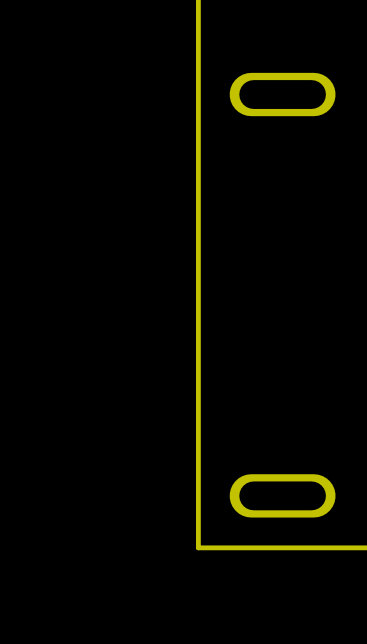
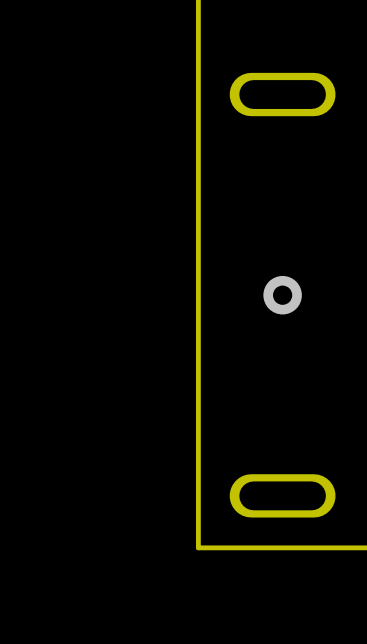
via: none -> (282, 295)

